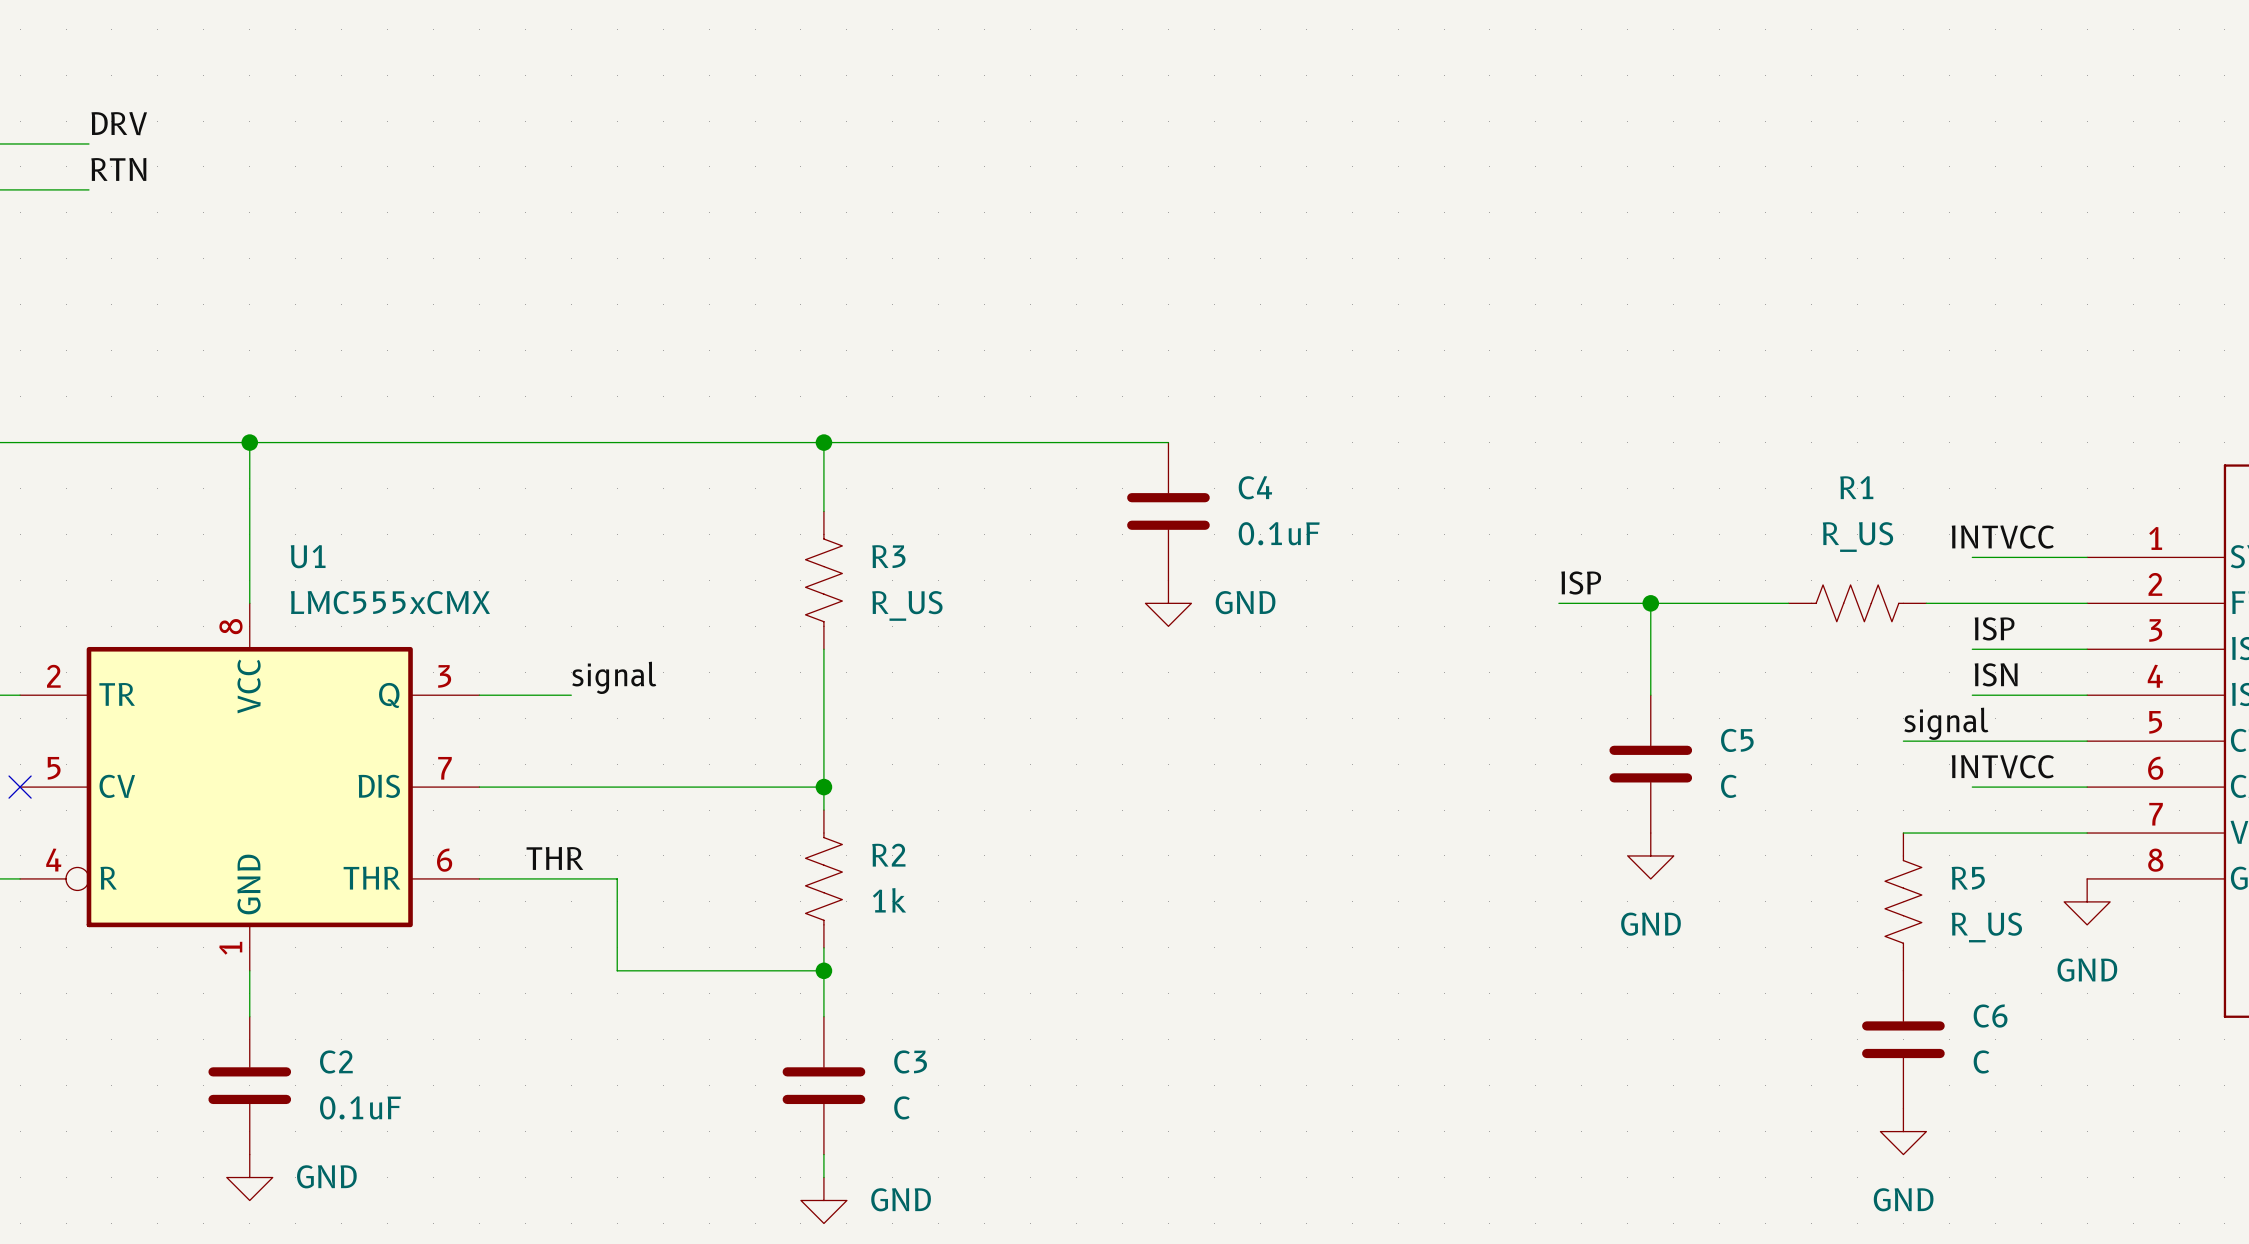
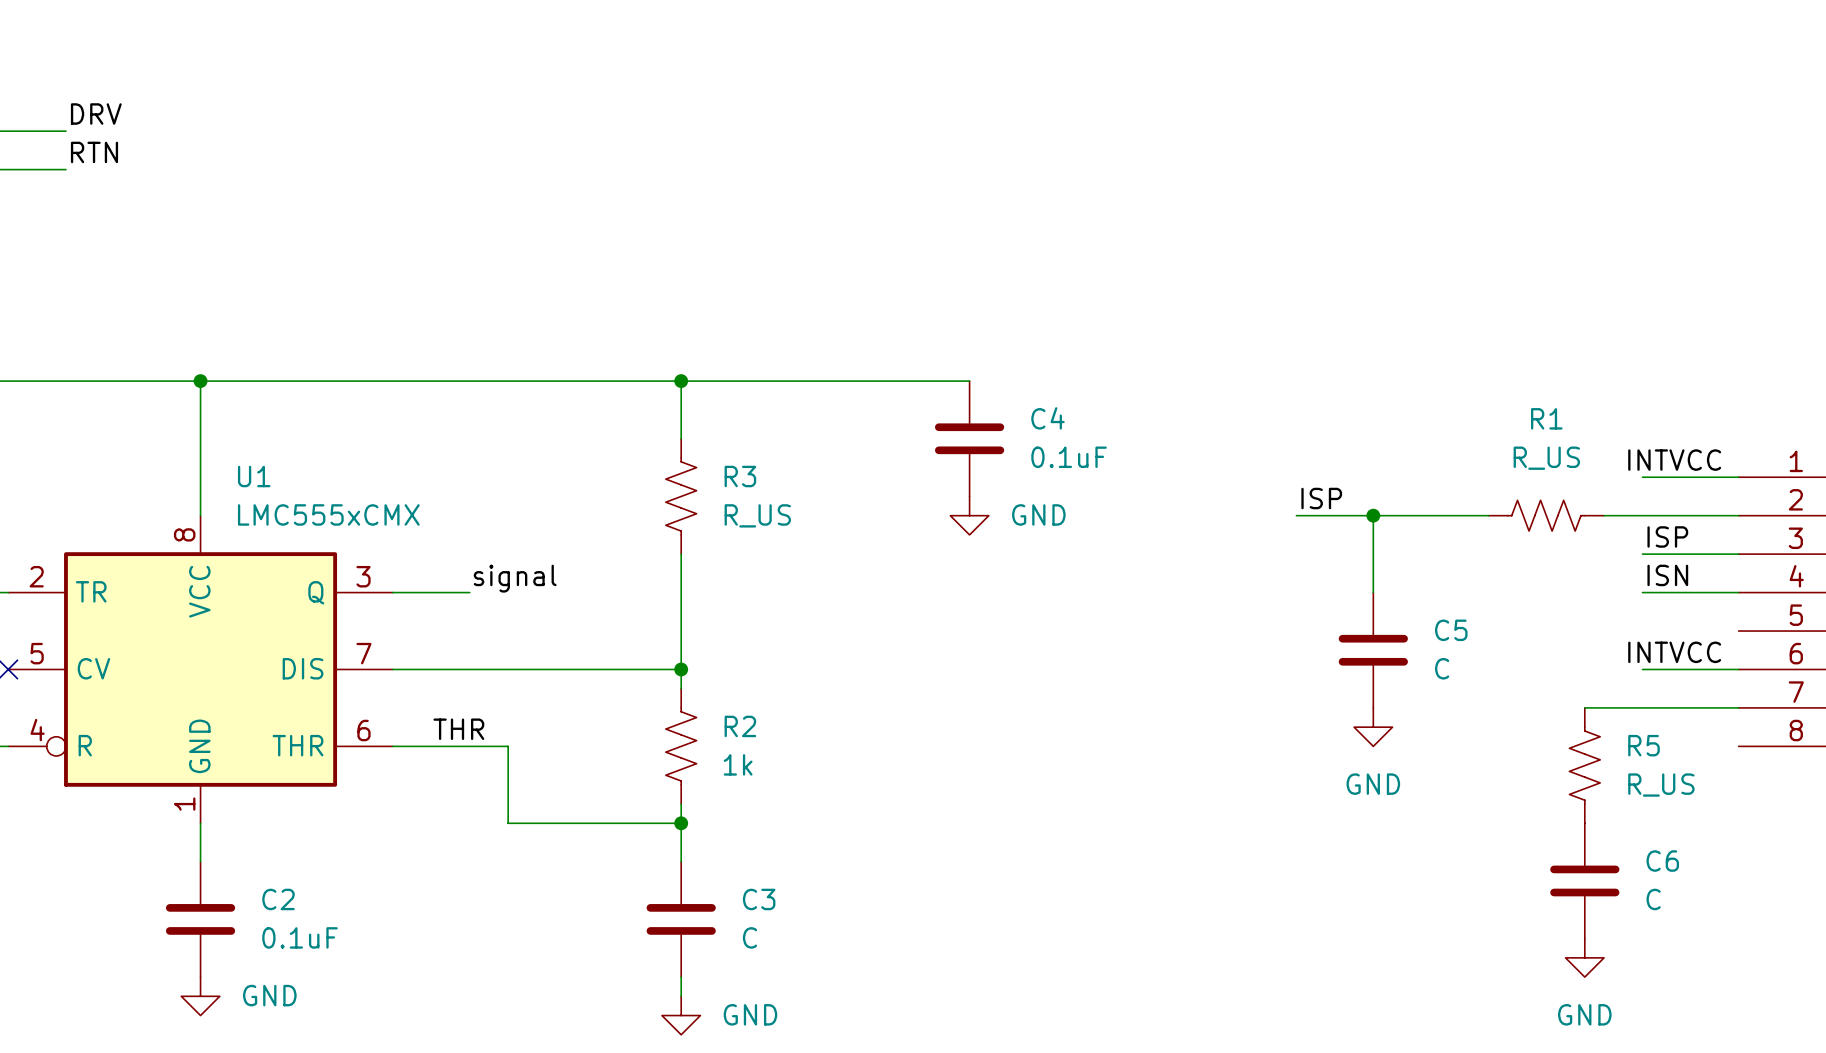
label: signal (1946, 723) -> none
wire: (1903, 741) (2087, 741) -> none
power symbol: GND (2087, 901) -> none

